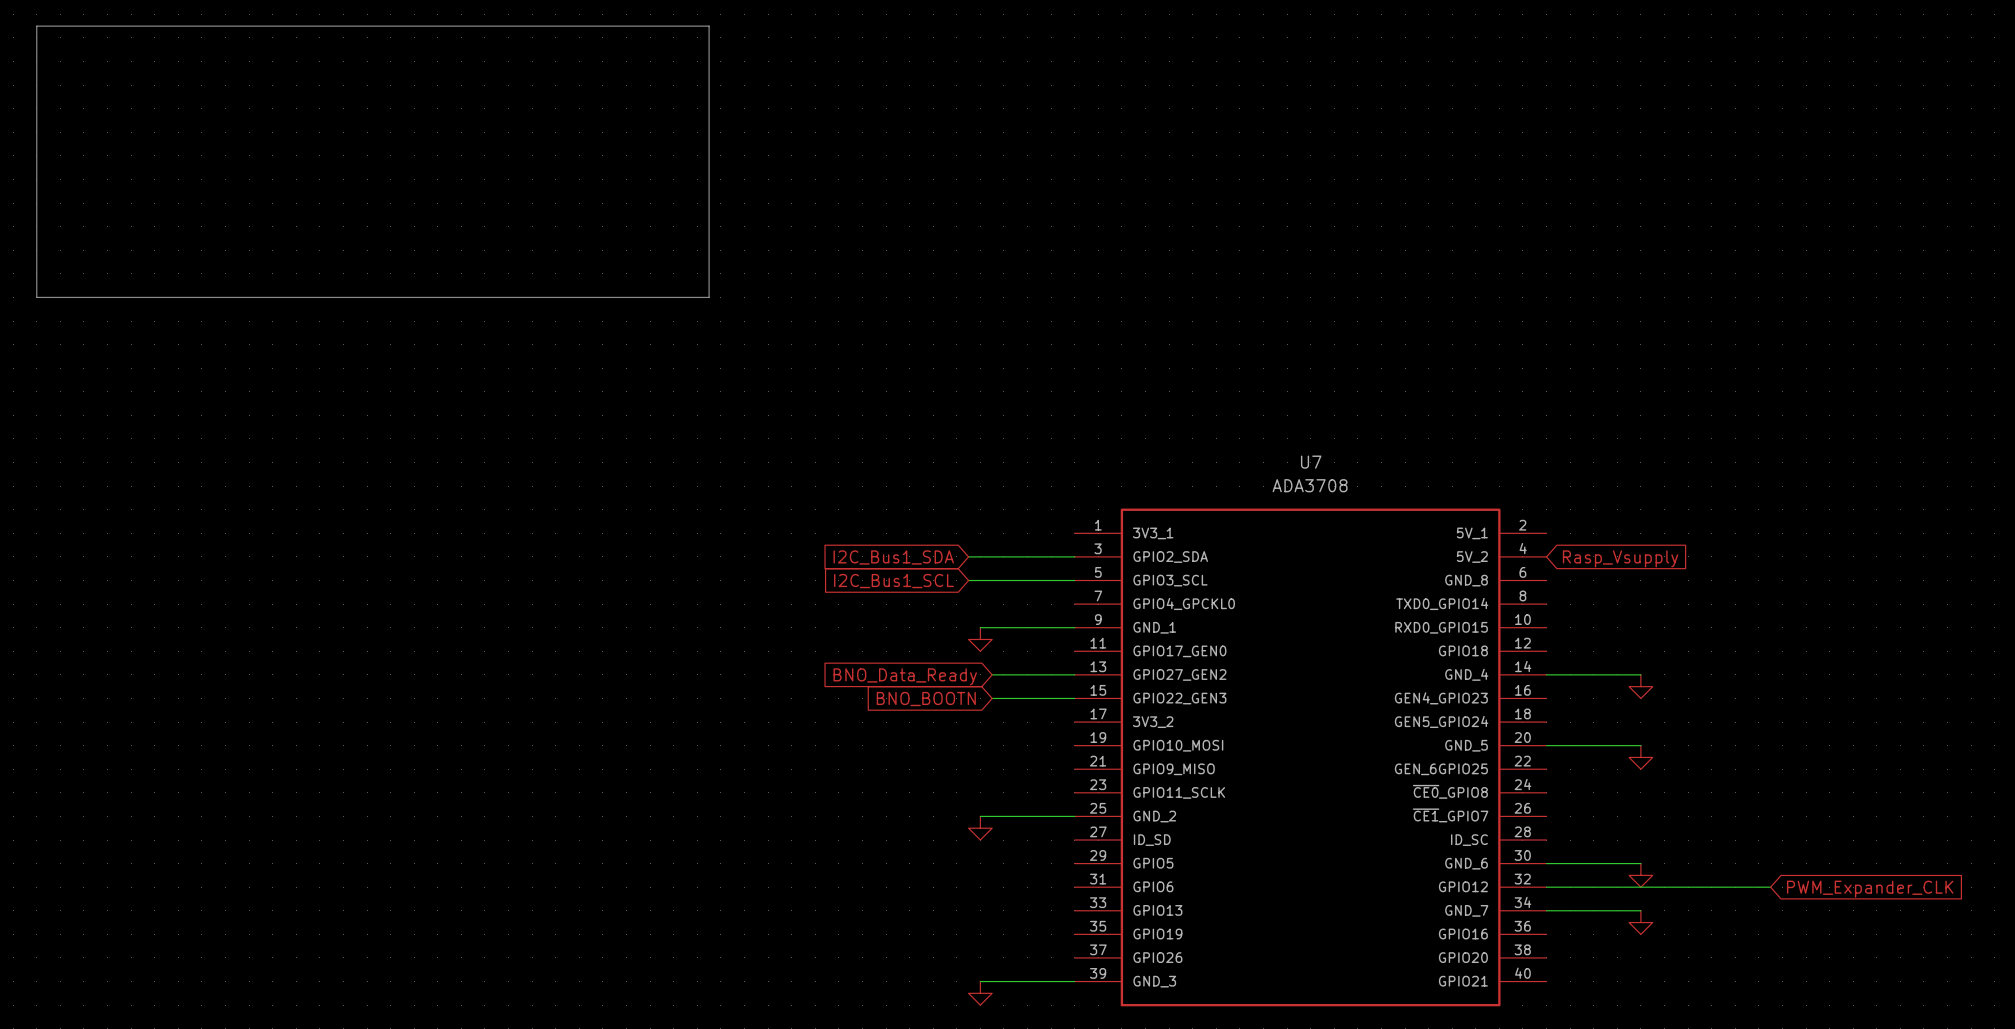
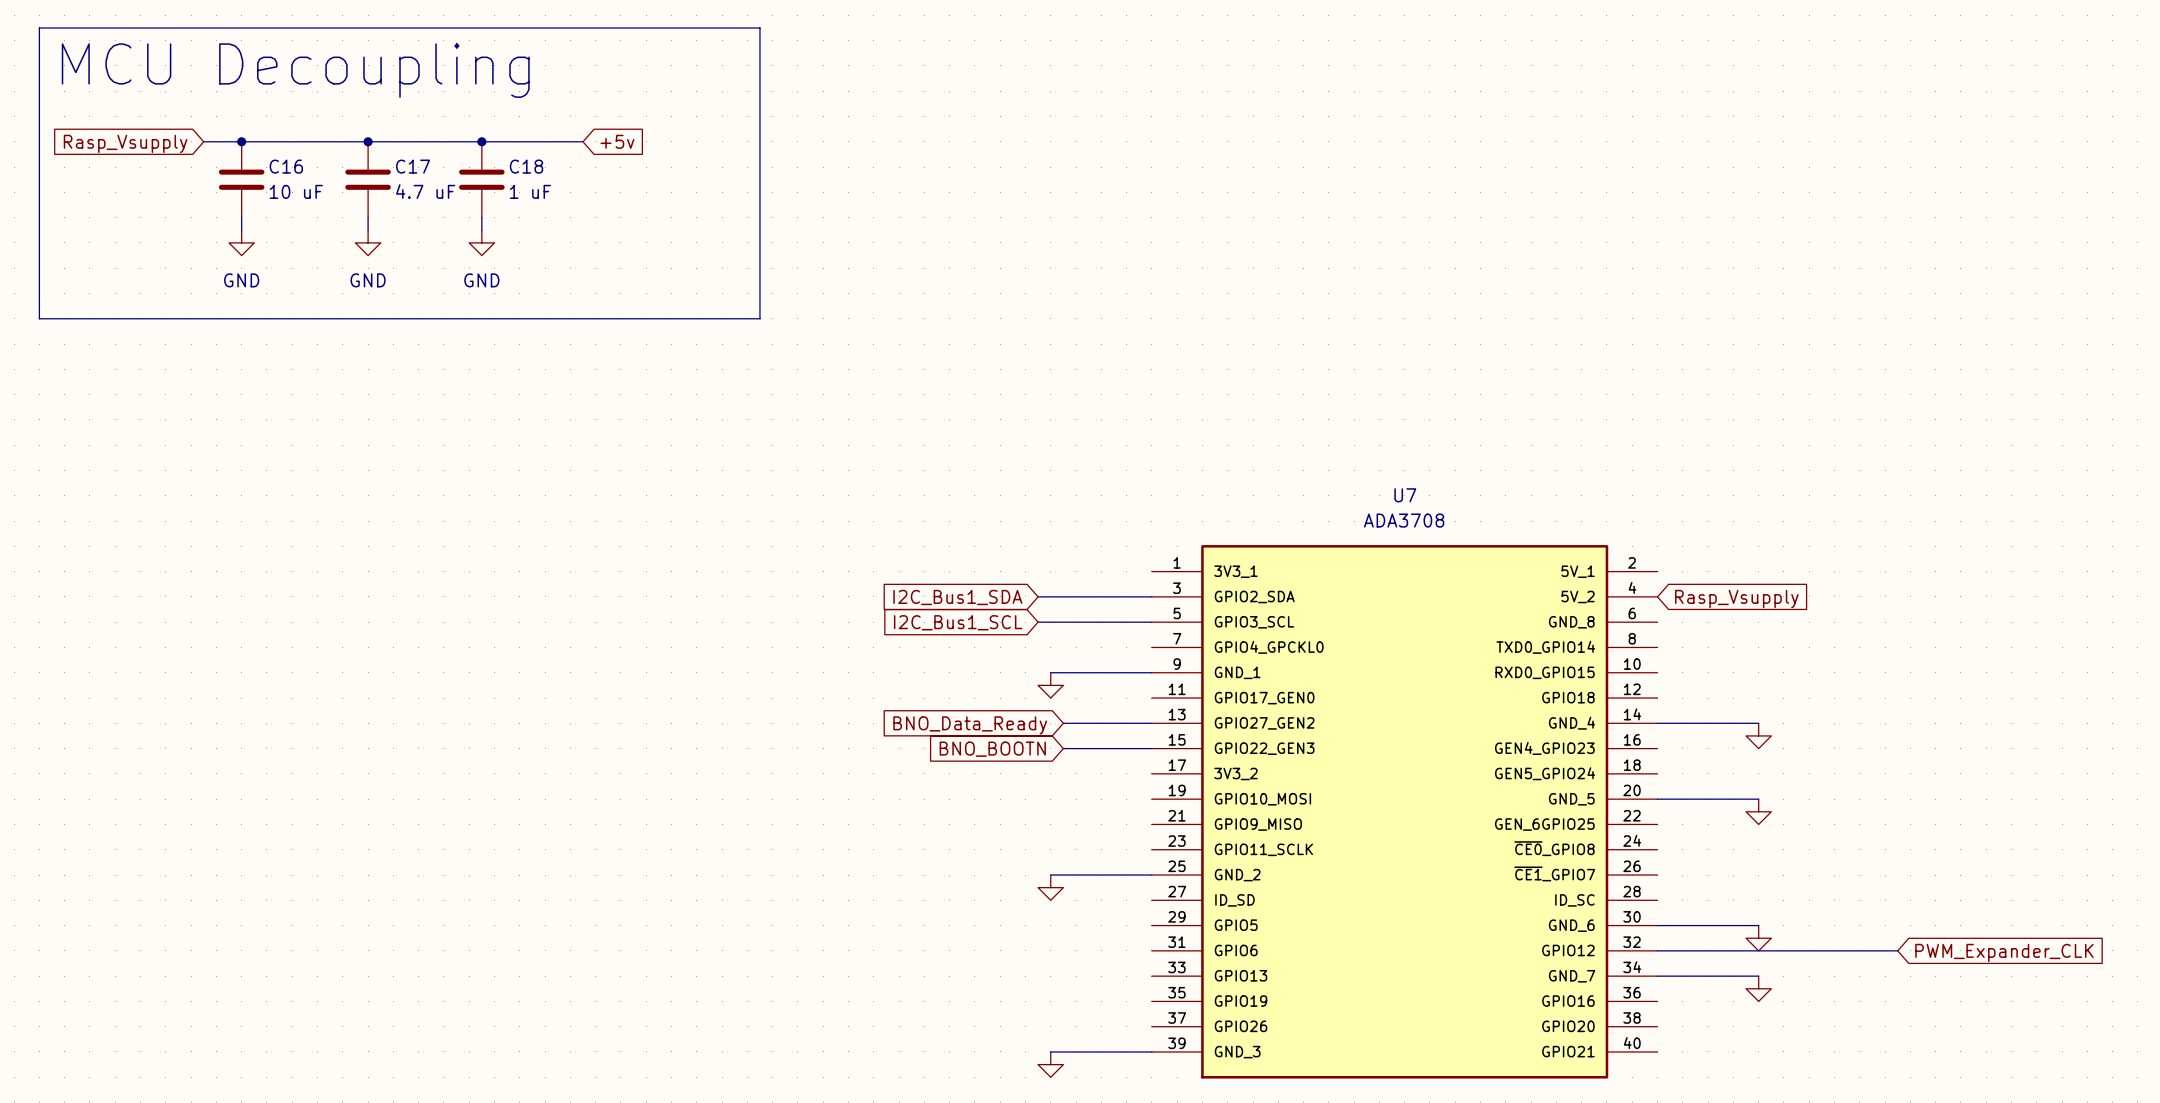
text: none -> MCU Decoupling (295, 70)
wire: none -> (203, 141) (582, 141)
junction: none -> (241, 141)
junction: none -> (368, 141)
junction: none -> (481, 141)
global label: none -> +5v (617, 141)
global label: none -> Rasp_Vsupply (125, 143)
C16: none -> 10 uF (241, 179)
C17: none -> 4.7 uF (368, 179)
C18: none -> 1 uF (481, 179)
wire: none -> (241, 217) (241, 230)
wire: none -> (368, 217) (368, 230)
wire: none -> (481, 217) (481, 230)
power symbol: none -> GND (241, 242)
power symbol: none -> GND (368, 242)
power symbol: none -> GND (481, 242)

